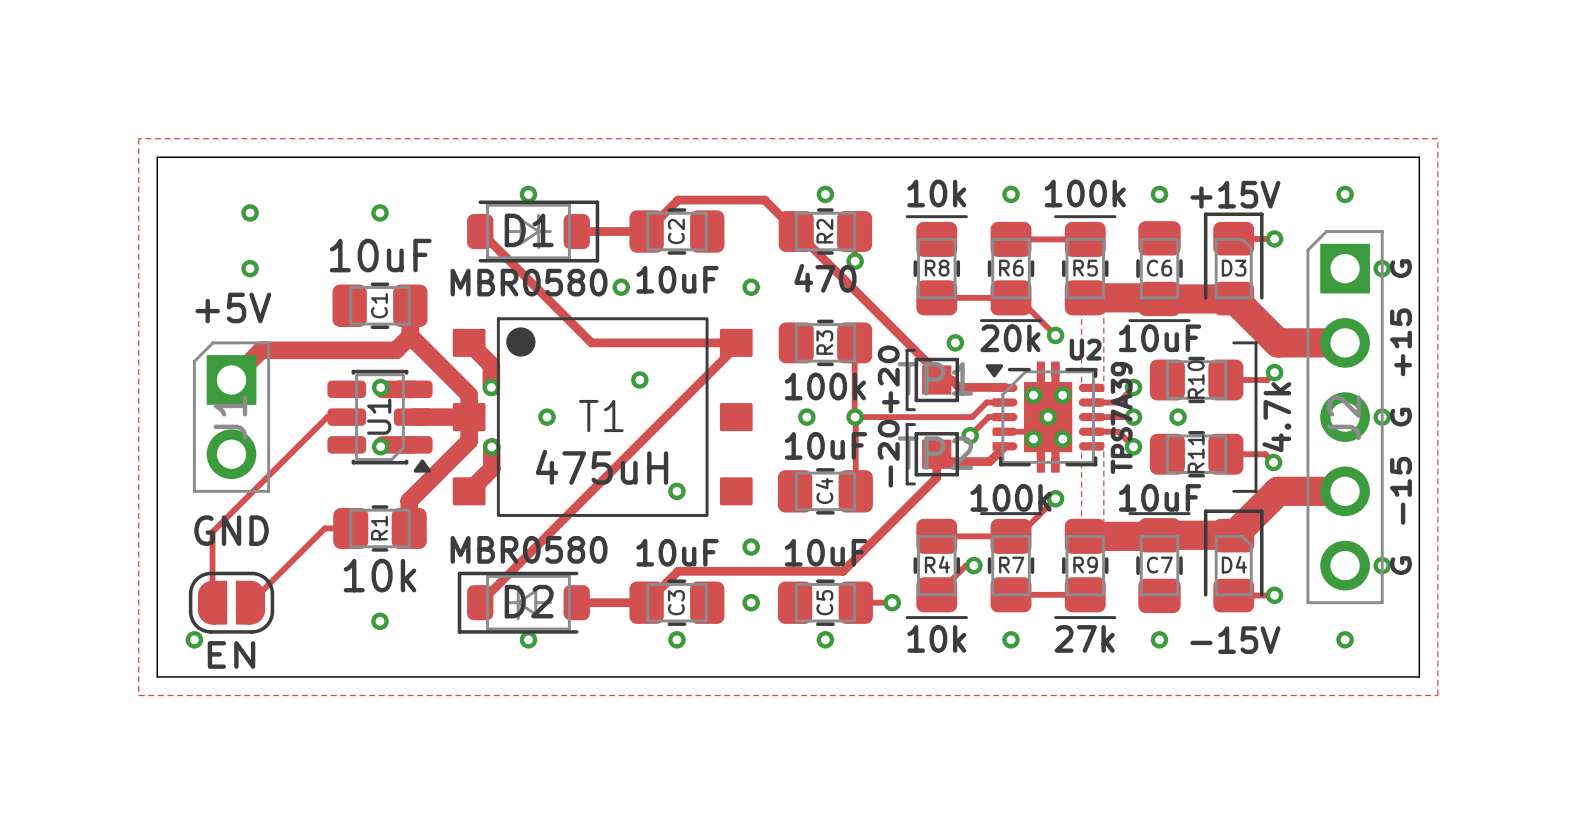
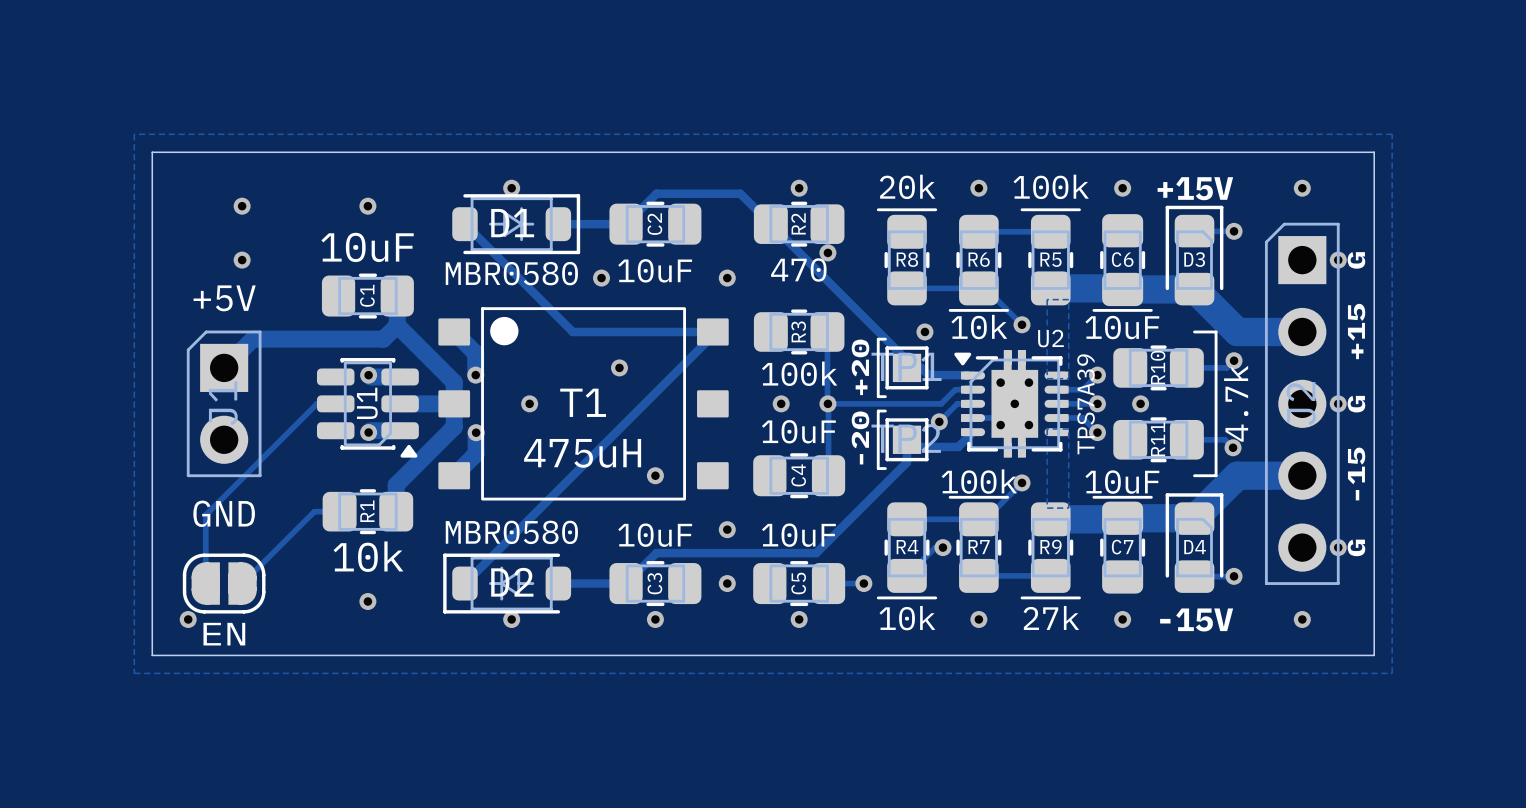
R8 value position: 10k (936, 193) -> 10k (979, 327)
R6 value position: 20k (1010, 338) -> 20k (907, 186)

